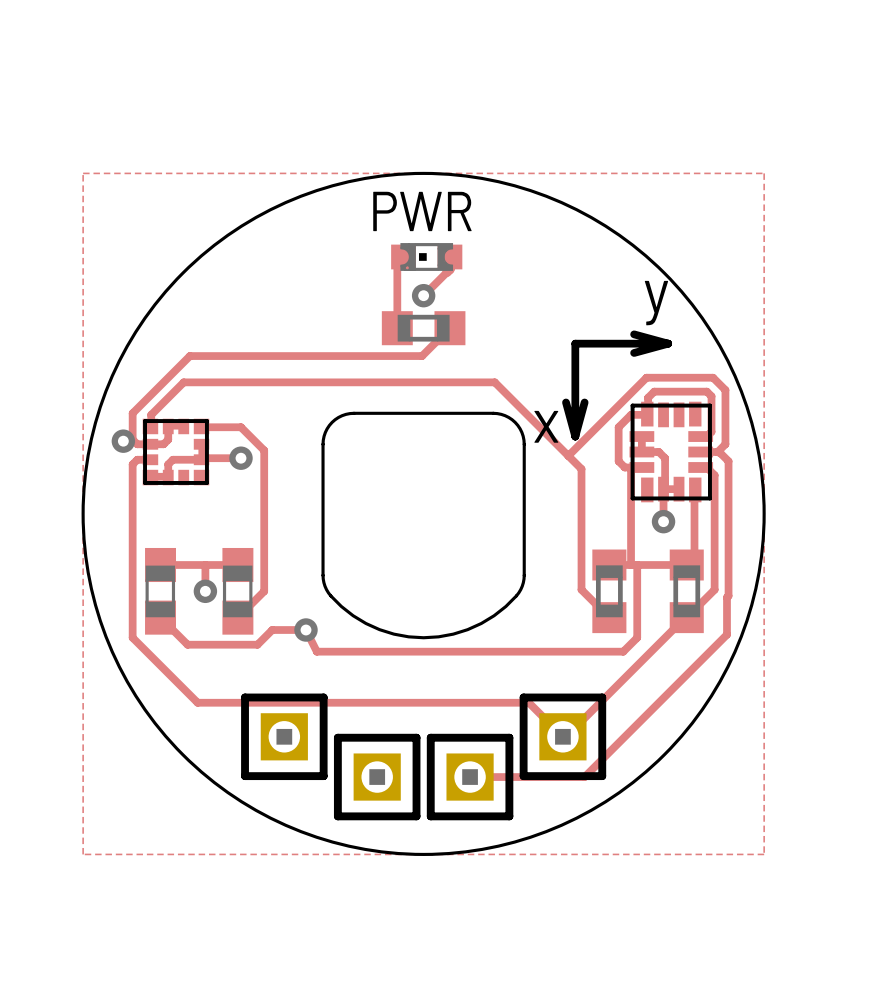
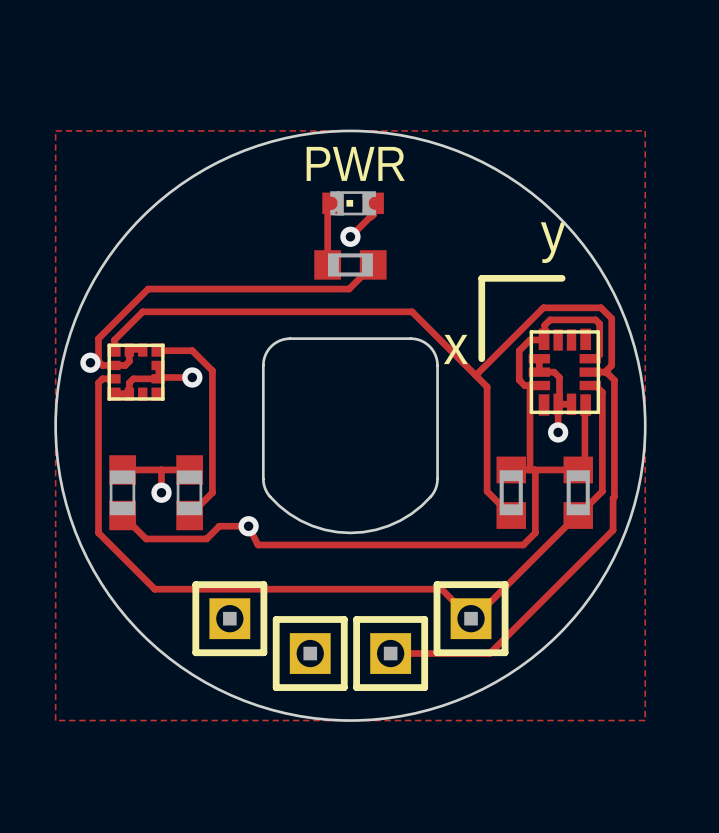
line: (634, 334) (668, 343) (634, 352) -> none
line: (566, 402) (575, 436) (584, 402) -> none

